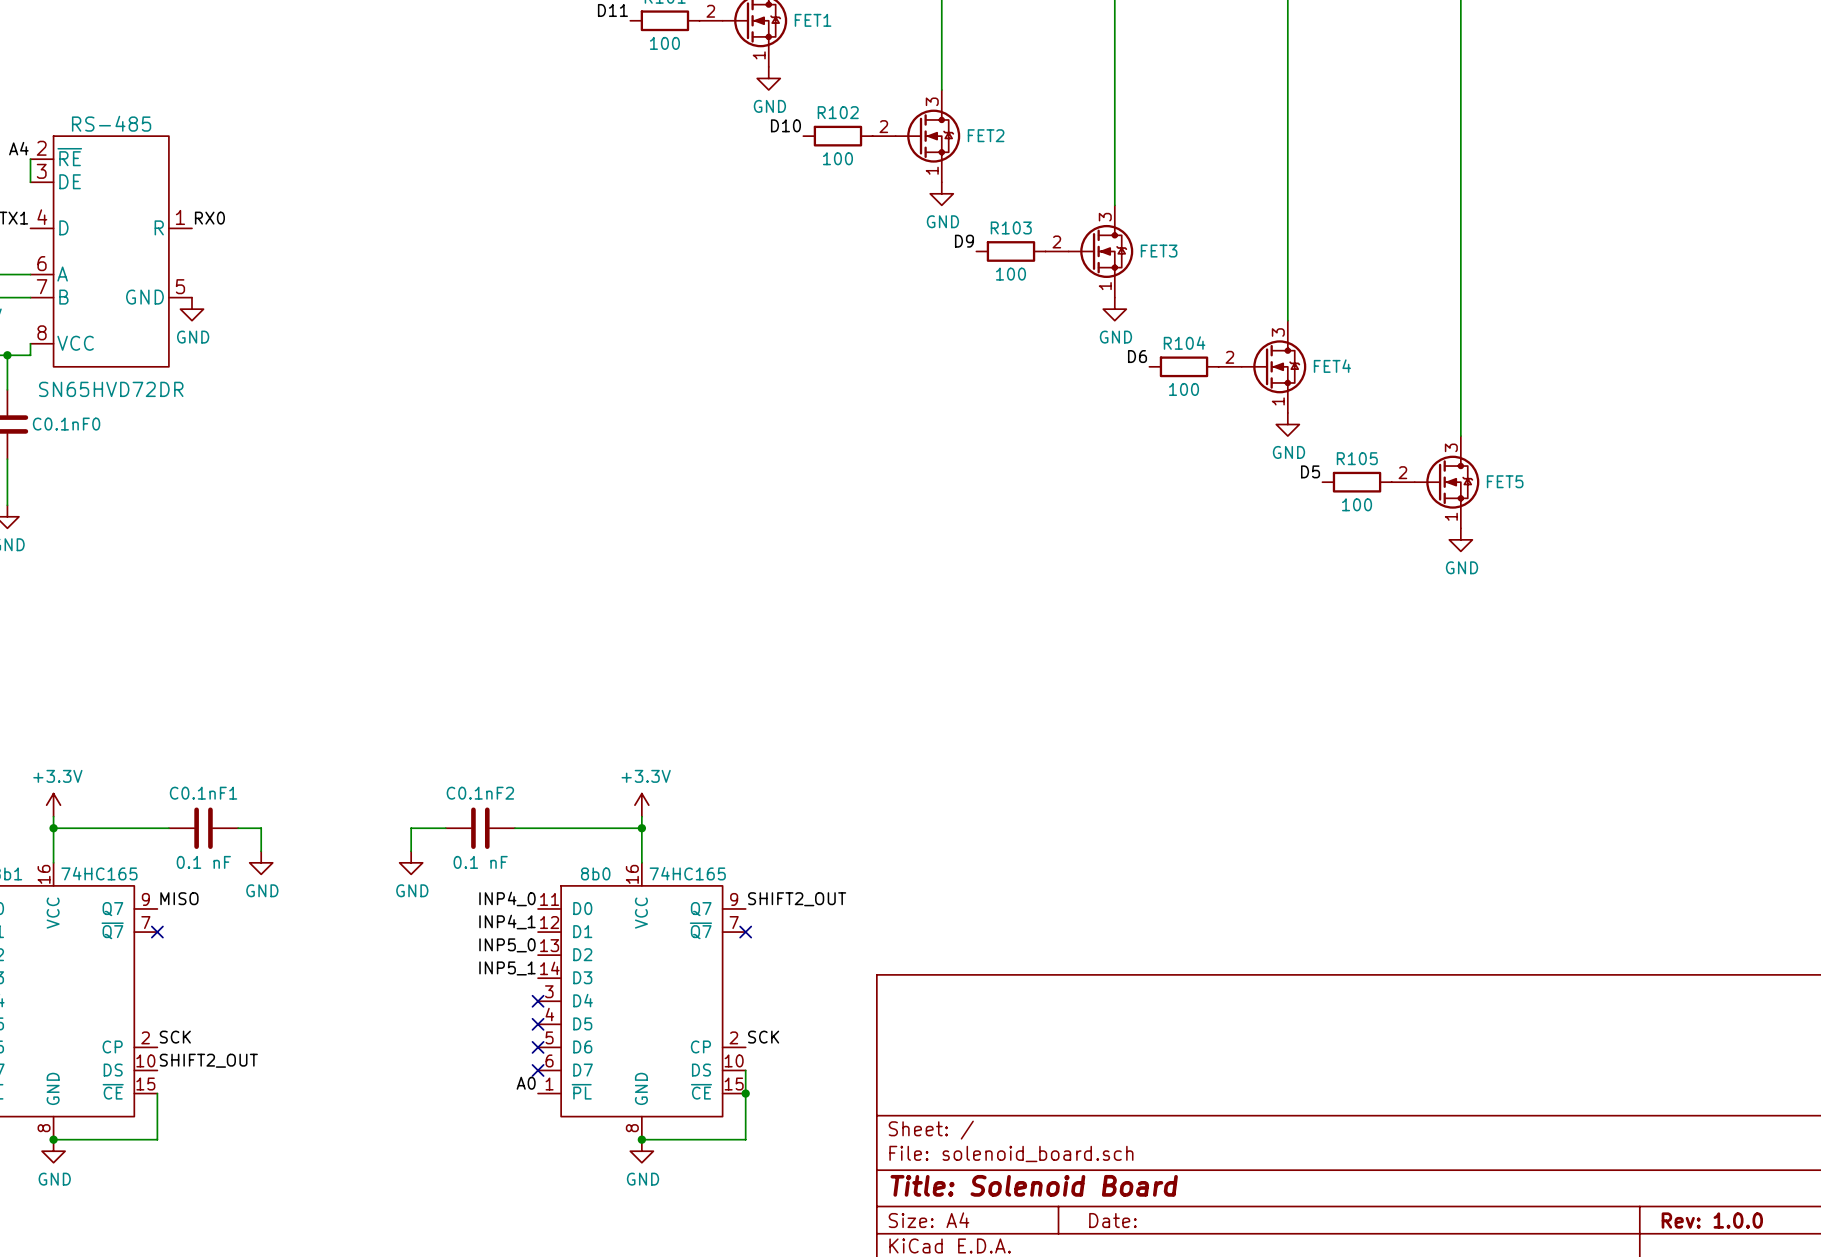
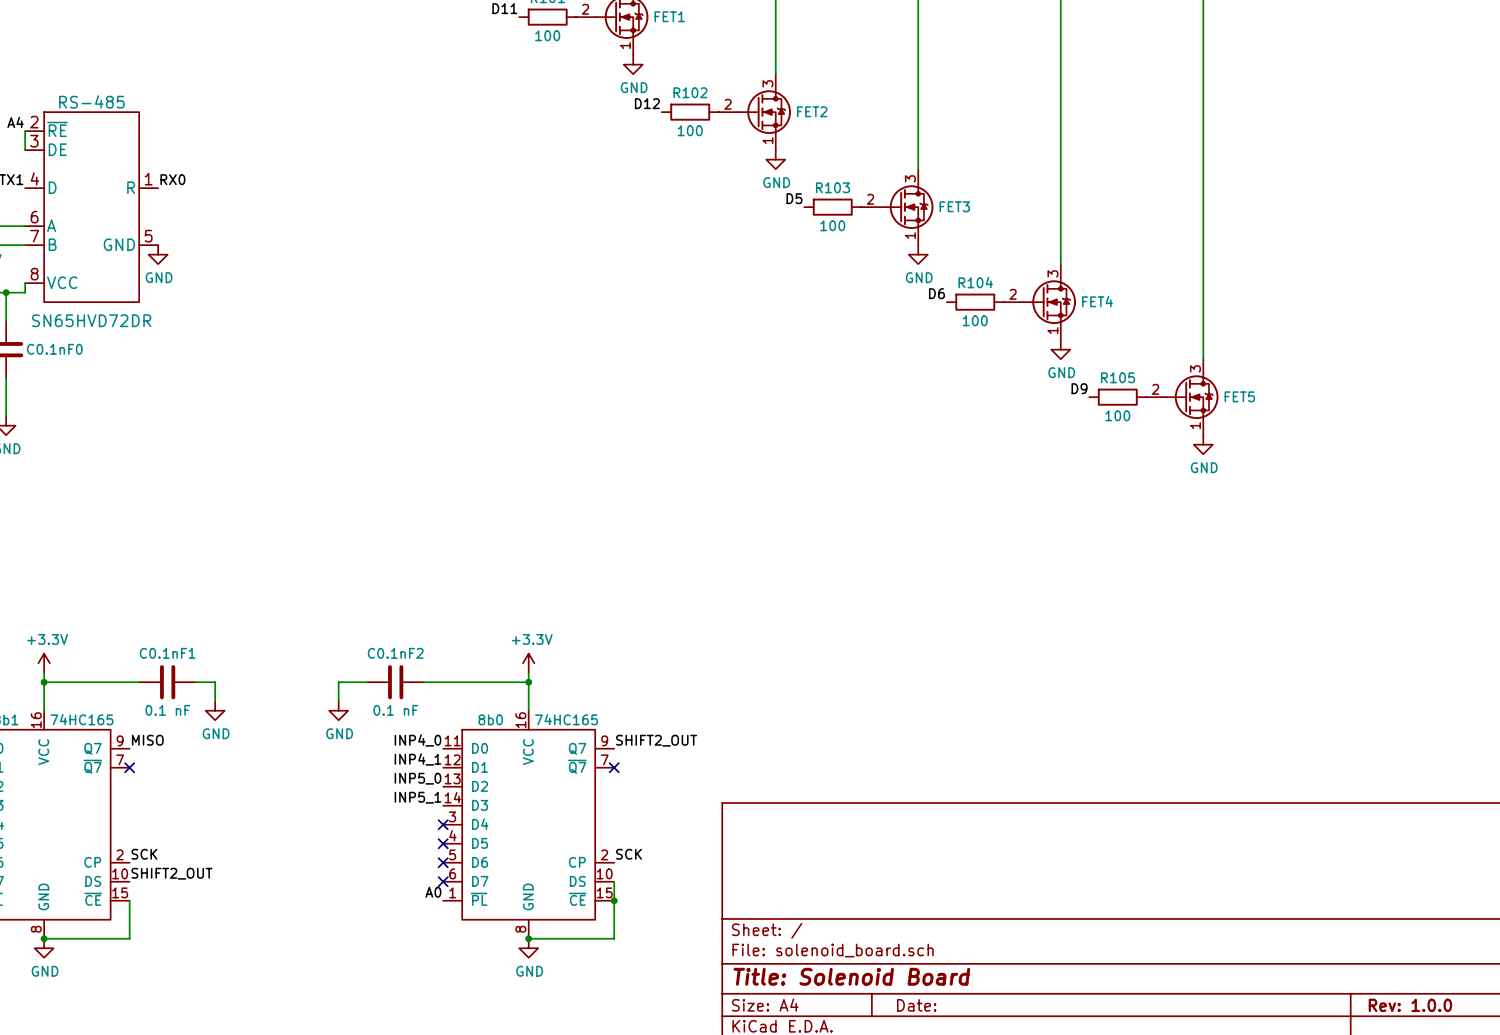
label: D10 (785, 125) -> D12 (647, 103)
label: D9 (964, 241) -> D5 (794, 198)
label: D5 (1310, 471) -> D9 (1079, 388)

